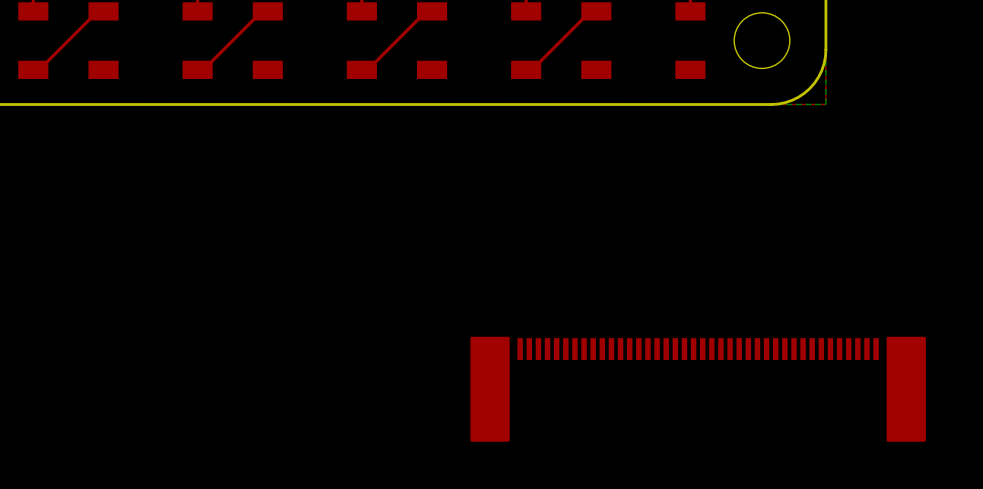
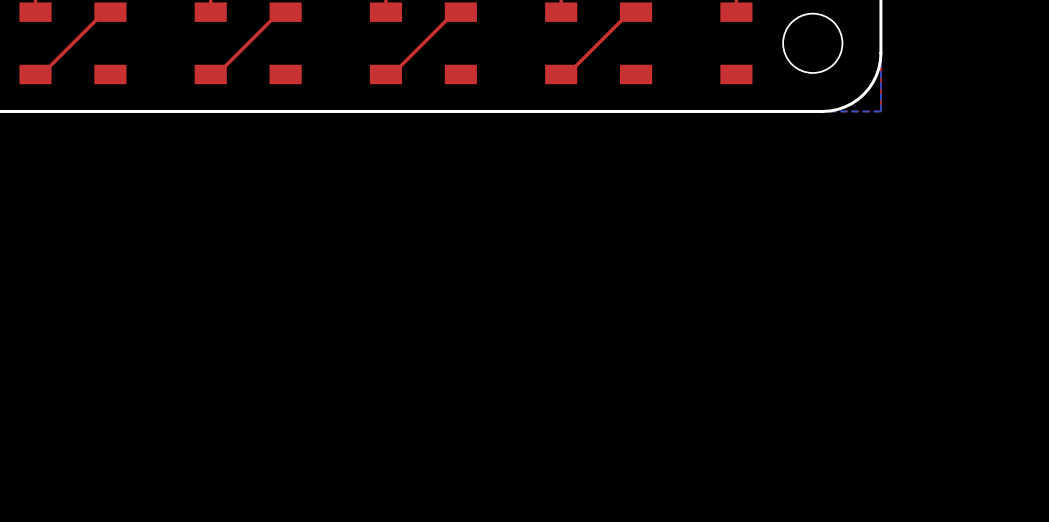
part: (698, 389) -> none

